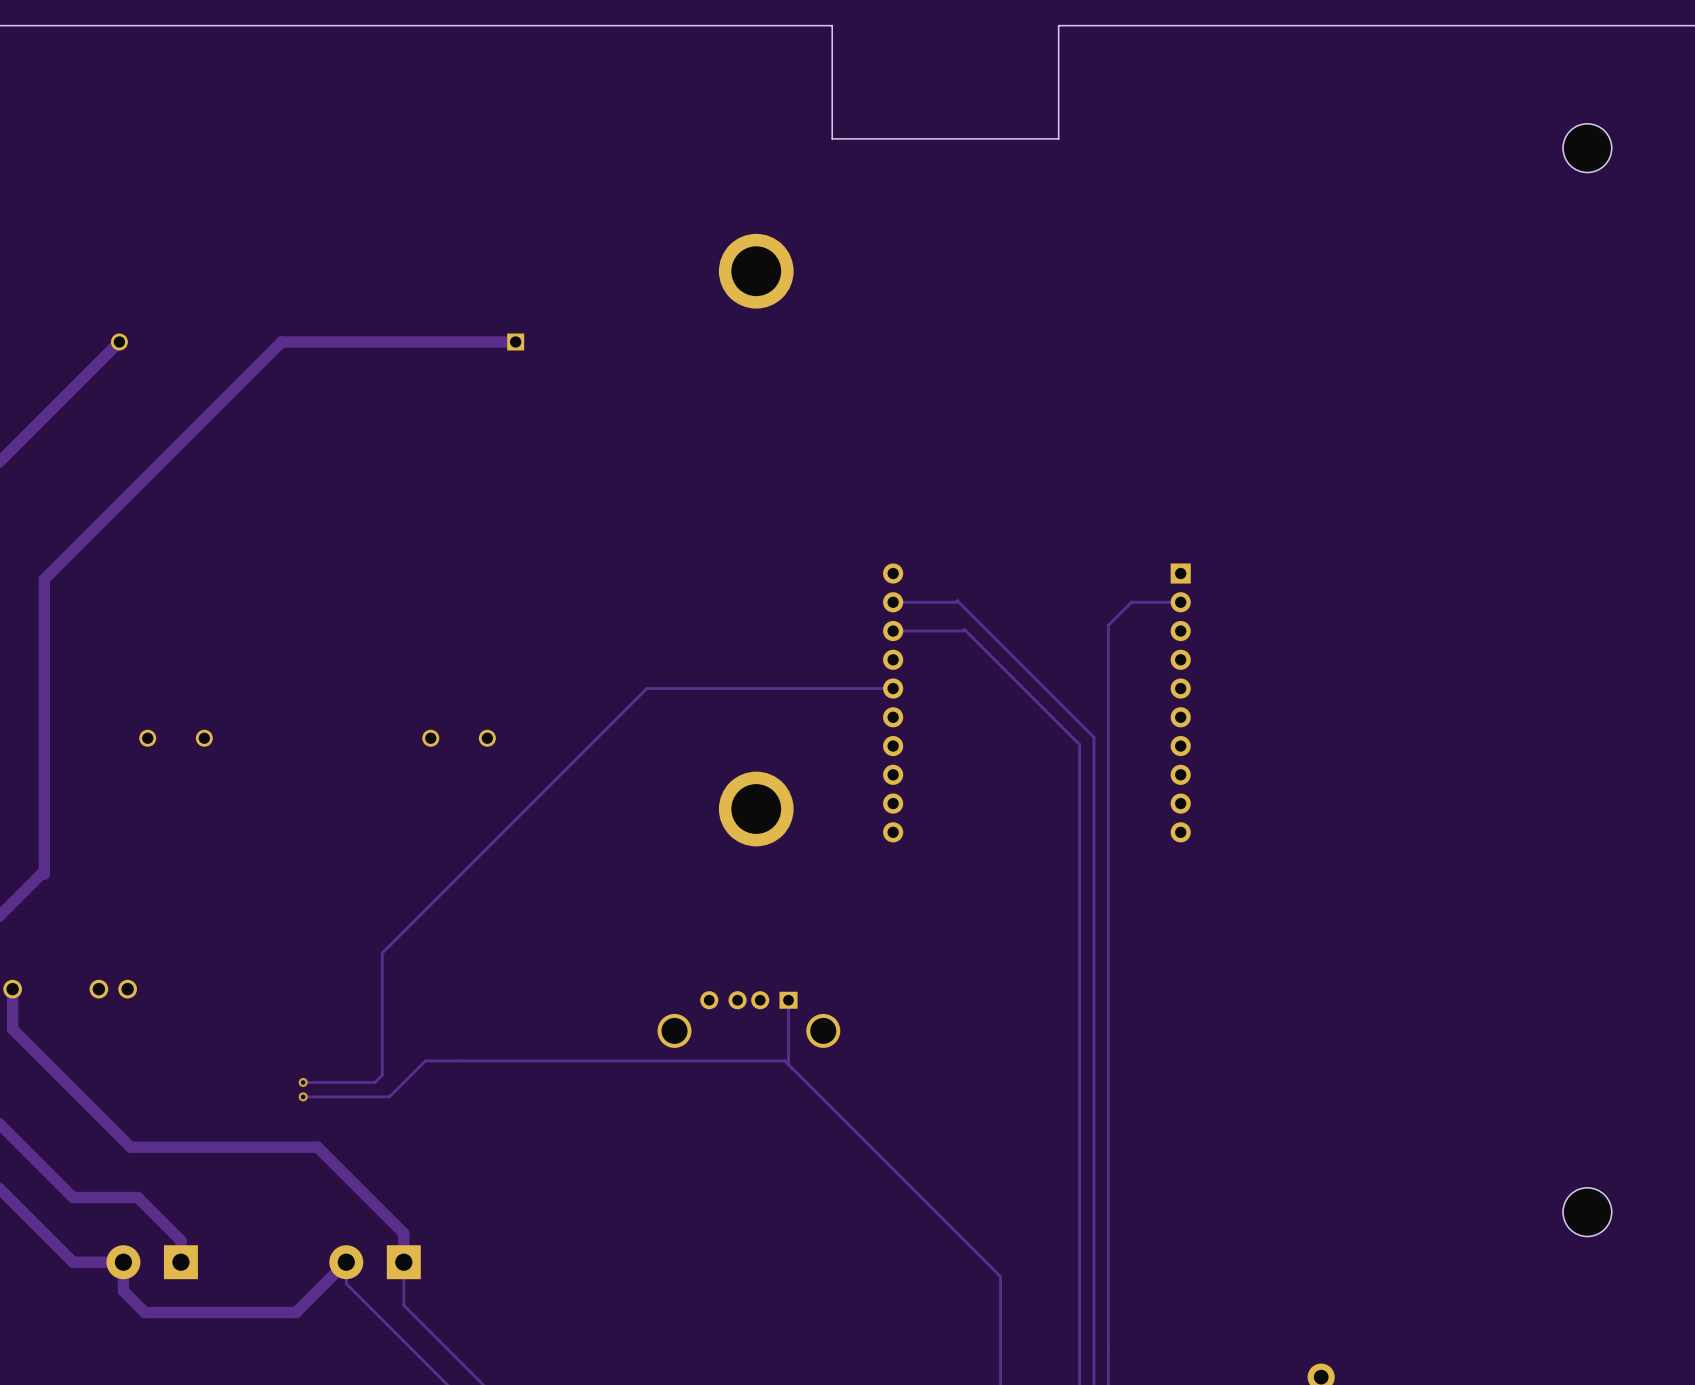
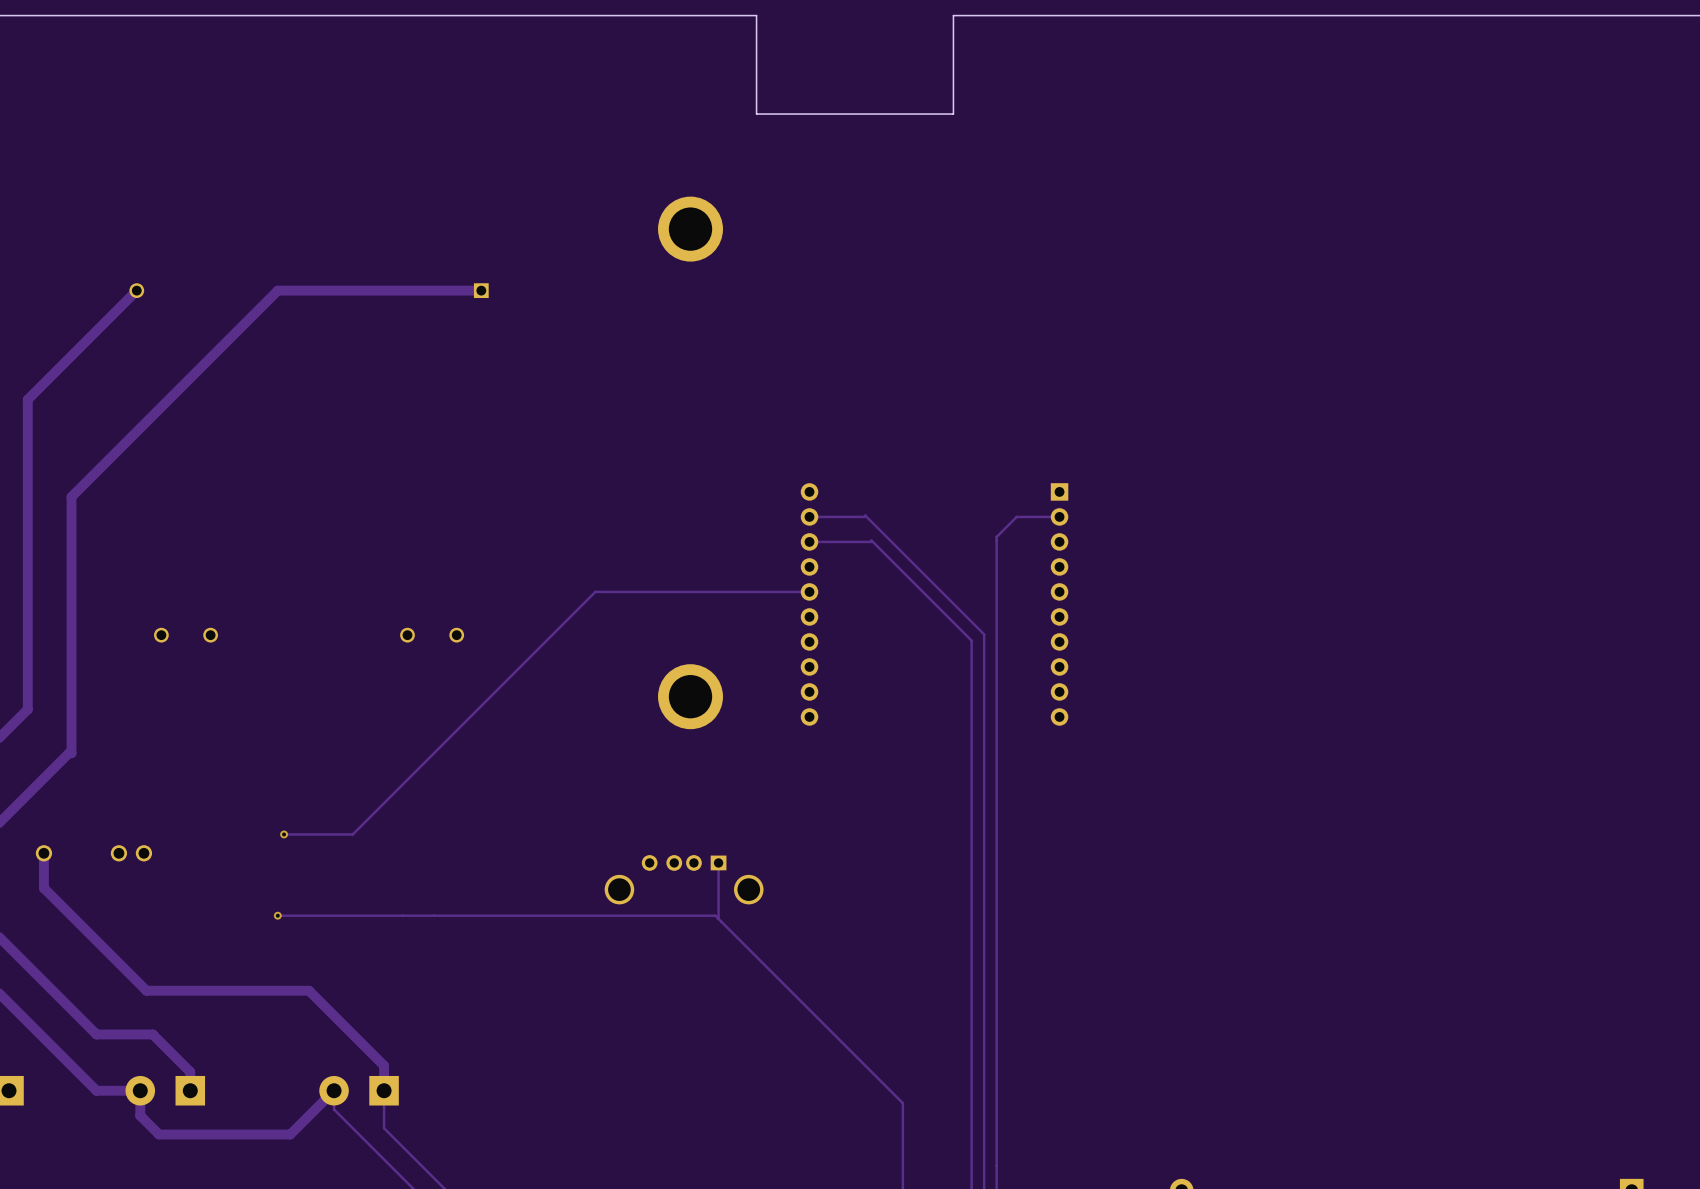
part: (1587, 148) -> none
track: (382, 953) (382, 1075) (375, 1082) (303, 1082) -> (365, 821) (352, 834) (284, 834)
via: none -> (284, 834)
via: none -> (277, 915)
track: (425, 1060) (389, 1096) (303, 1096) -> (402, 915) (277, 915)
via: (303, 1082) -> none
via: (303, 1096) -> none
part: (1587, 1212) -> none

